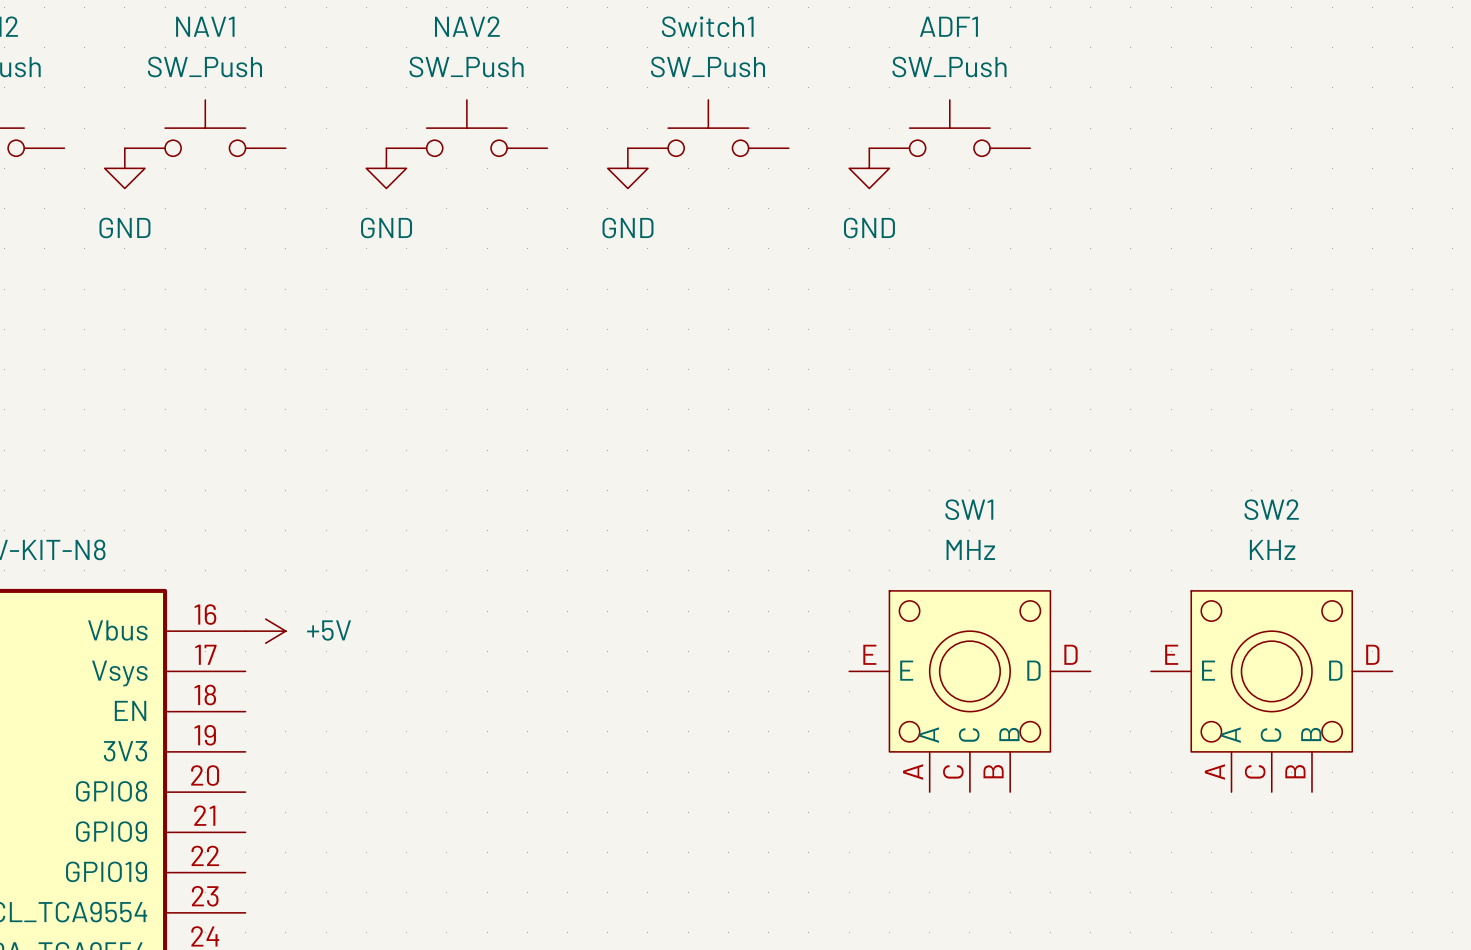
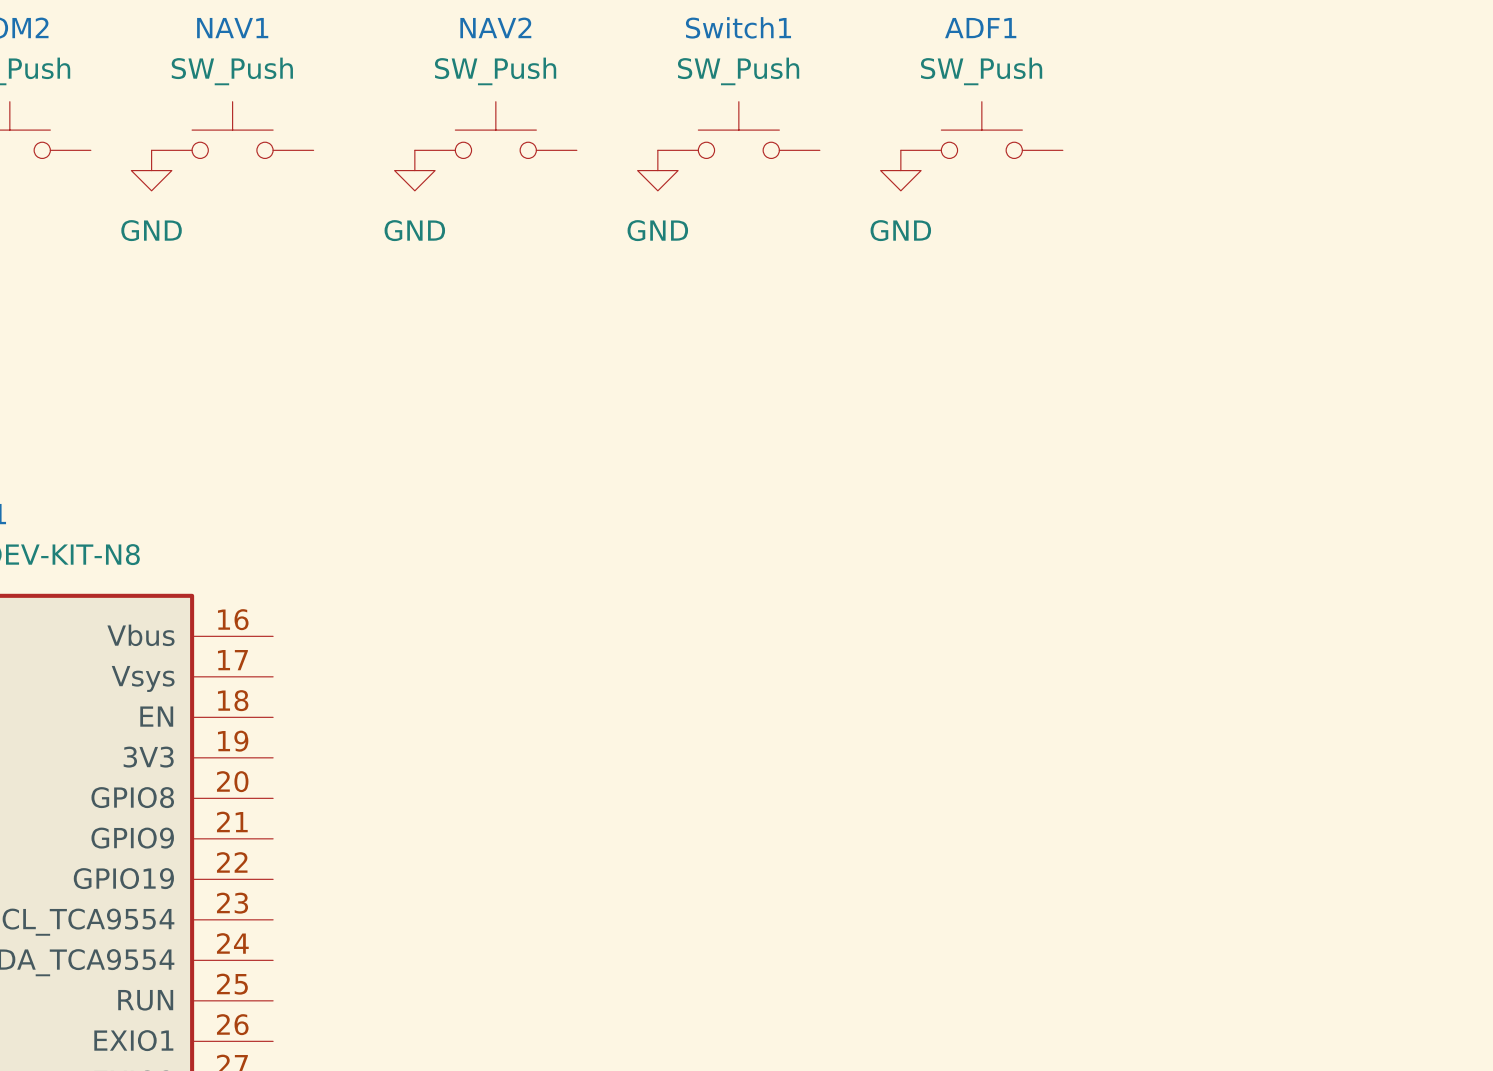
power symbol: +5V (265, 631) -> none
SW1: MHz (969, 691) -> none
SW2: KHz (1271, 691) -> none

